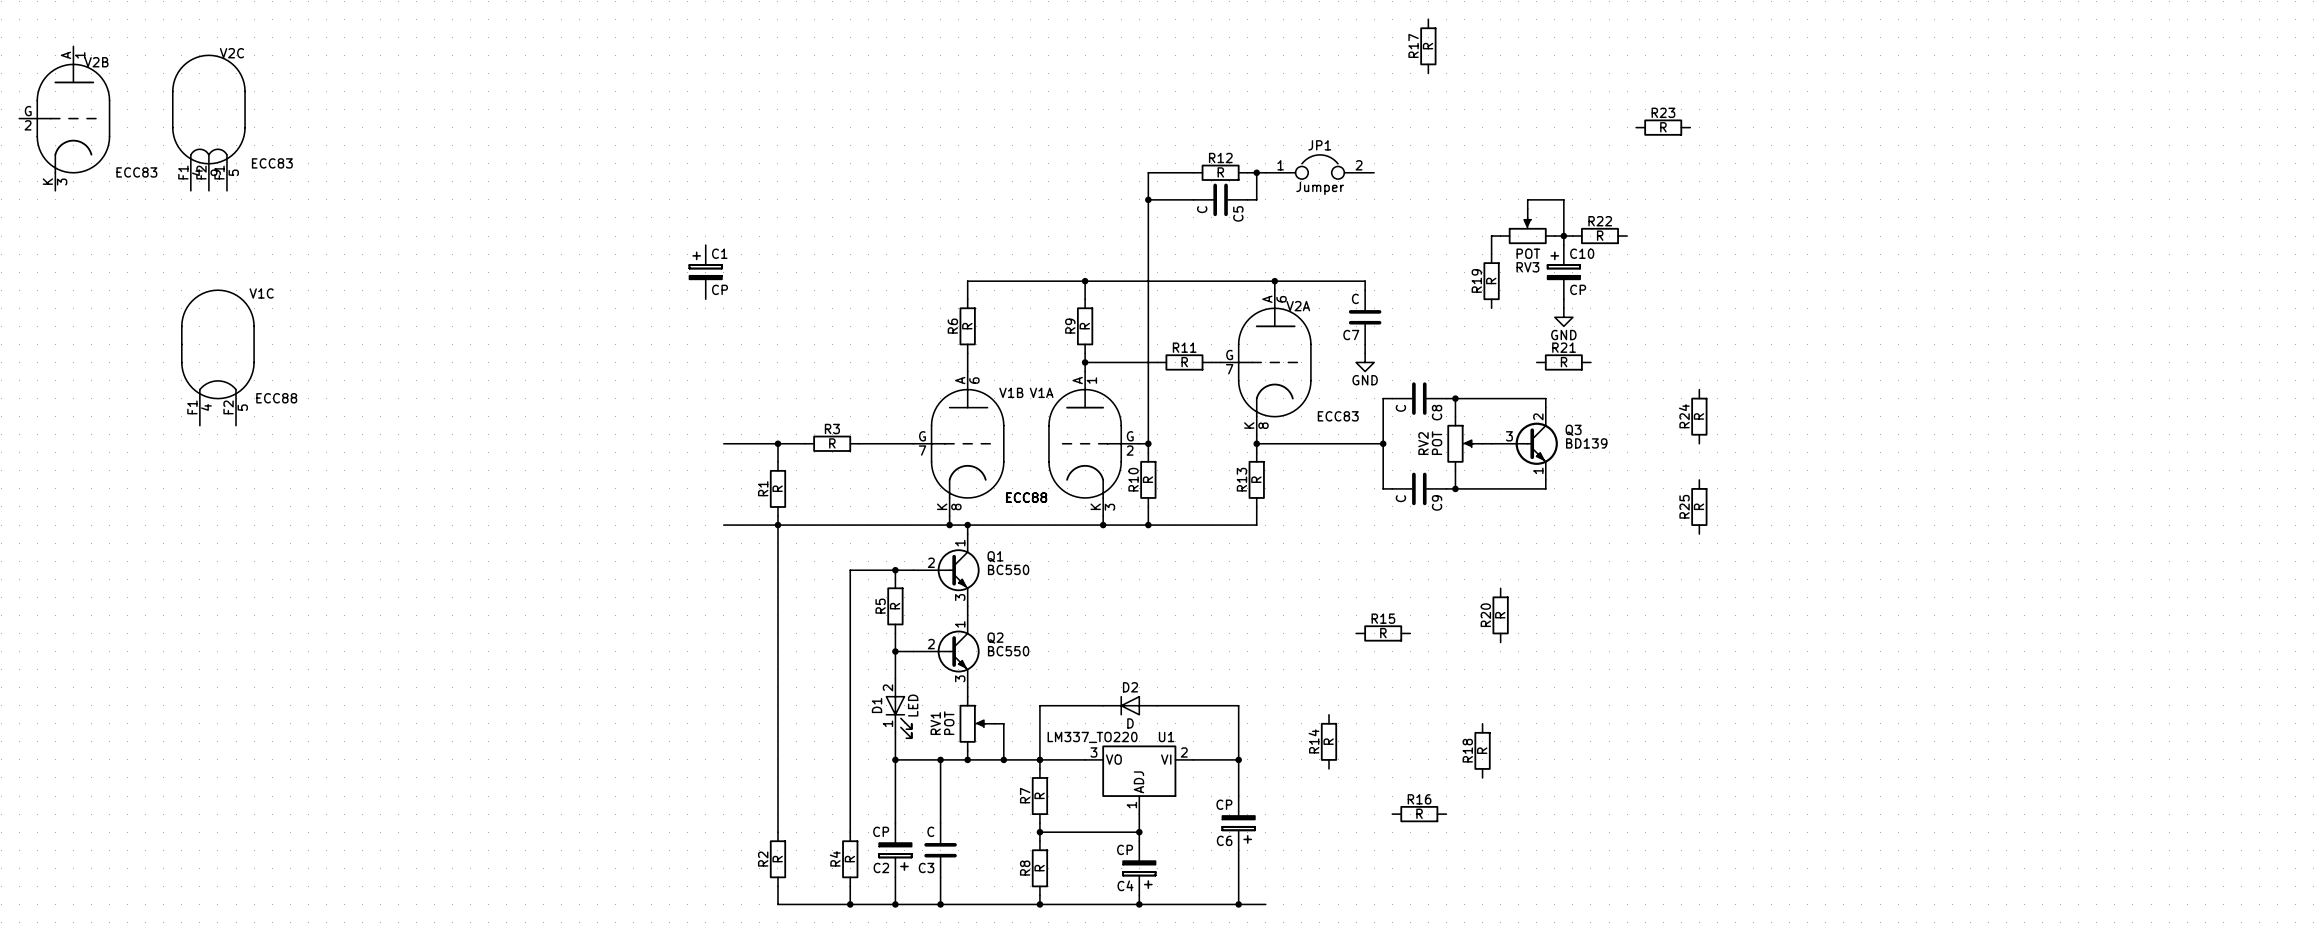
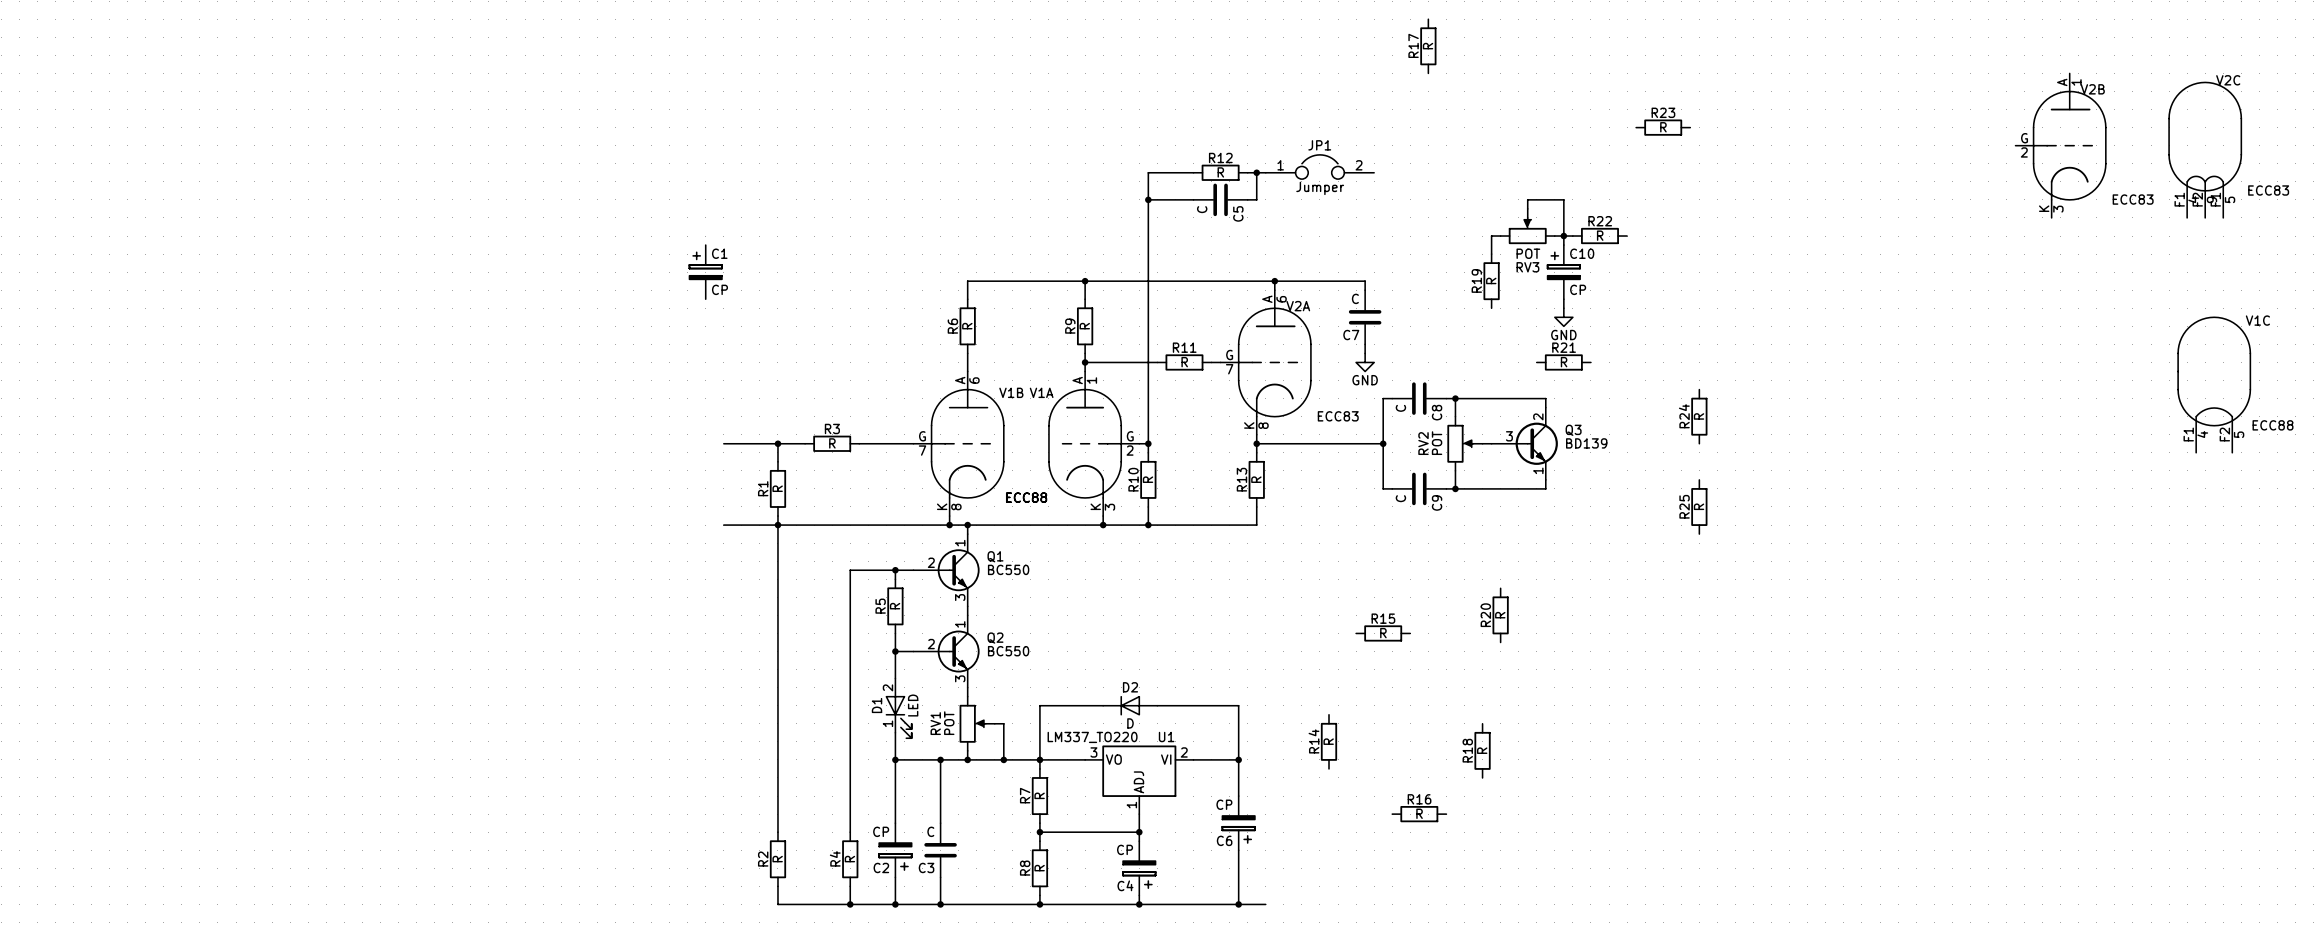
V2B position: (64, 118) -> (2060, 145)
V2C position: (208, 123) -> (2205, 150)
V1C position: (217, 357) -> (2214, 385)

